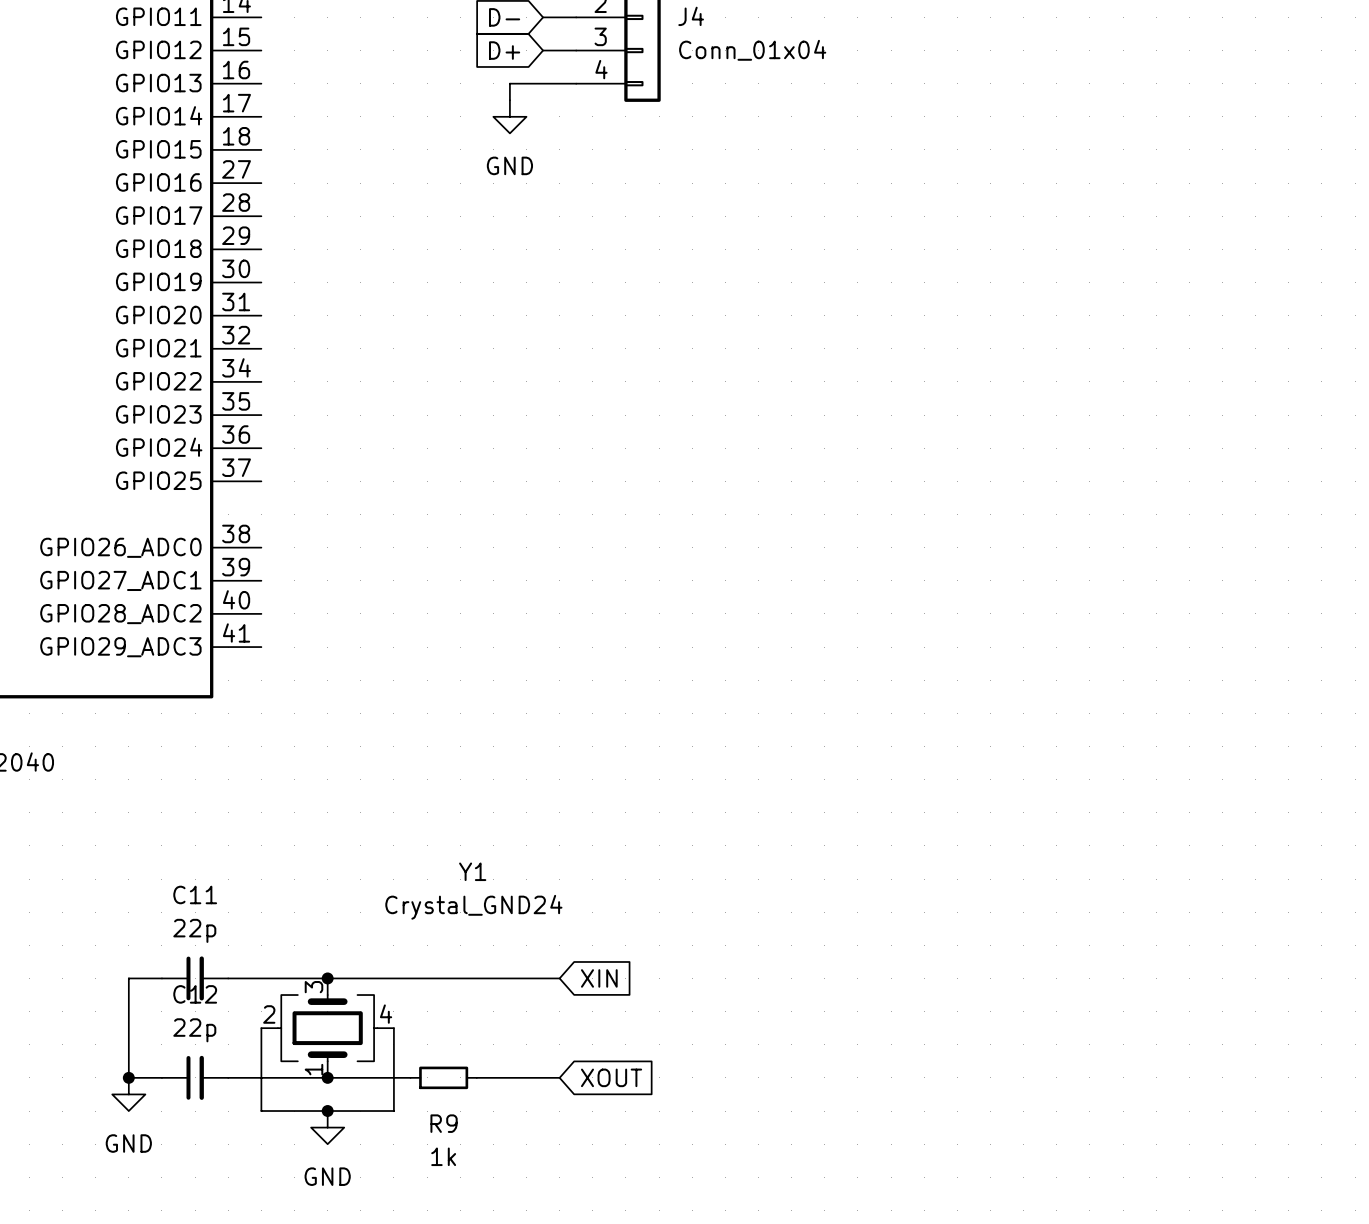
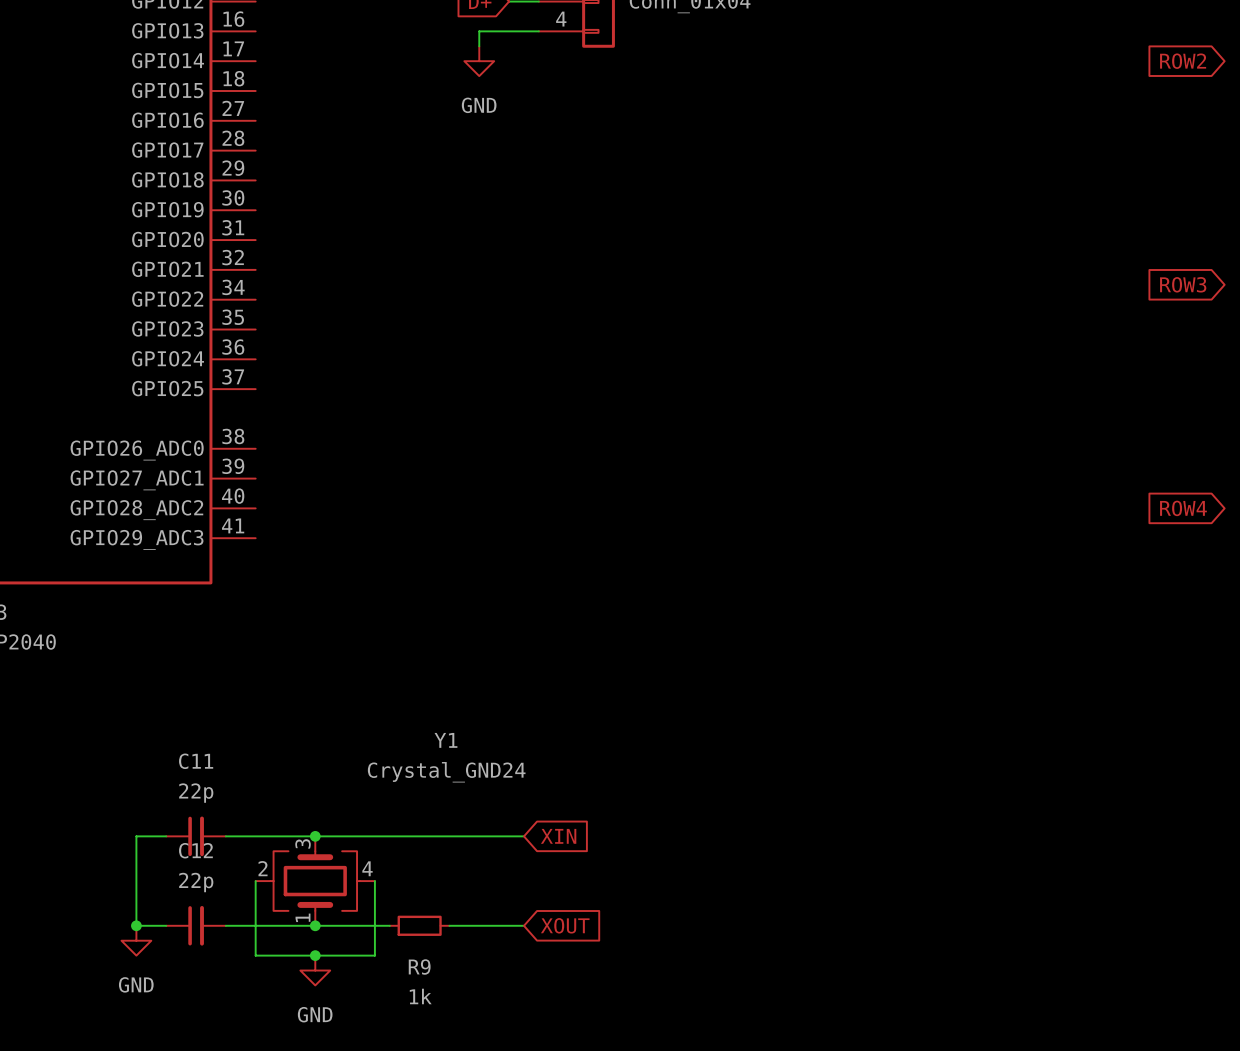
global label: none -> ROW2 (1183, 61)
global label: none -> ROW3 (1183, 284)
global label: none -> ROW4 (1183, 508)

